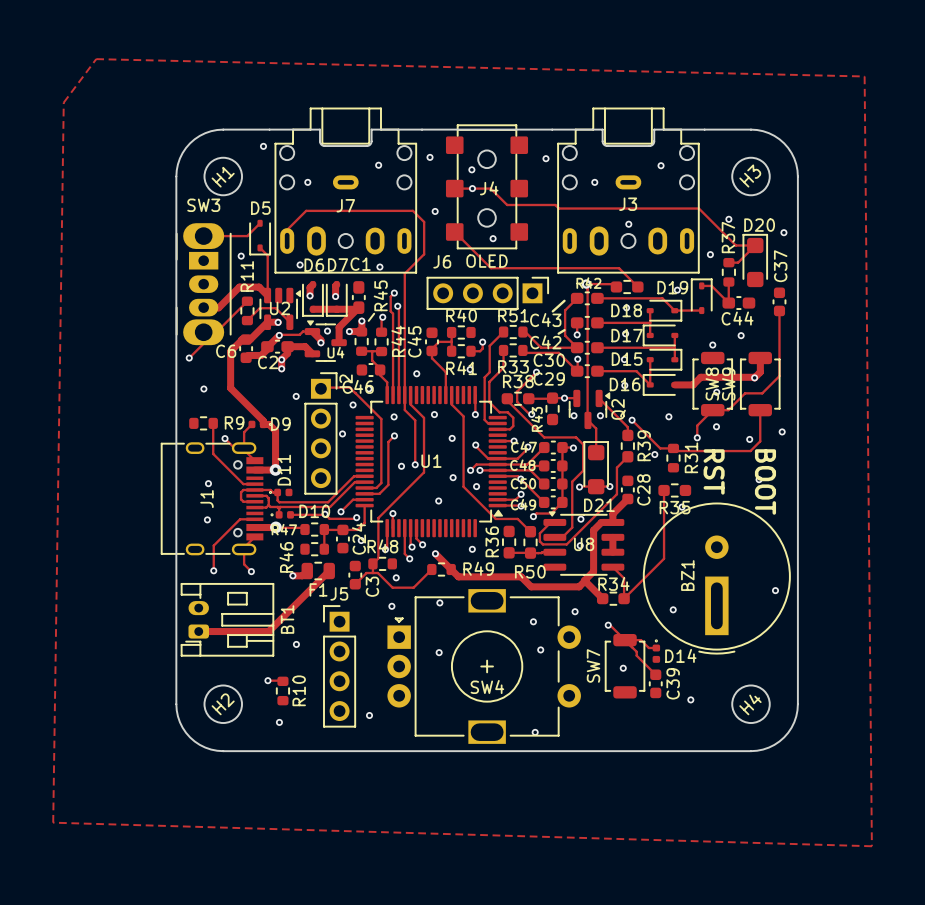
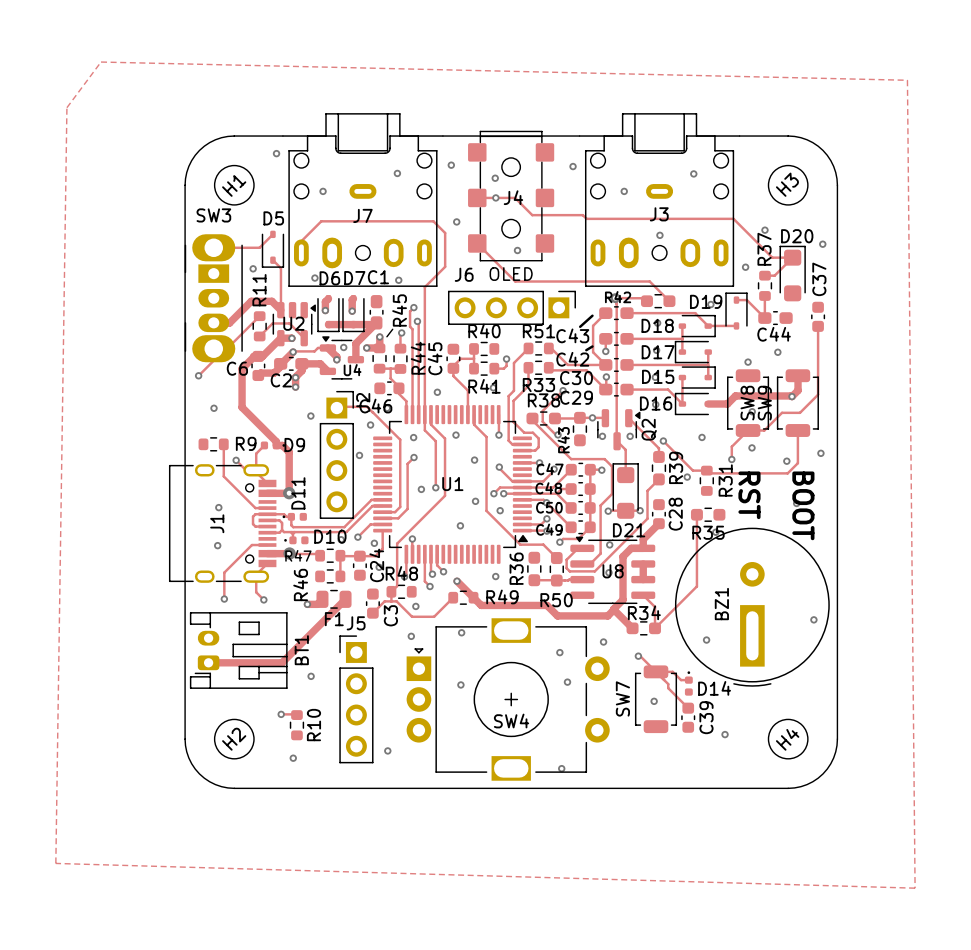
track: (290, 514) (325, 514) (329, 518) (356, 517) -> none

